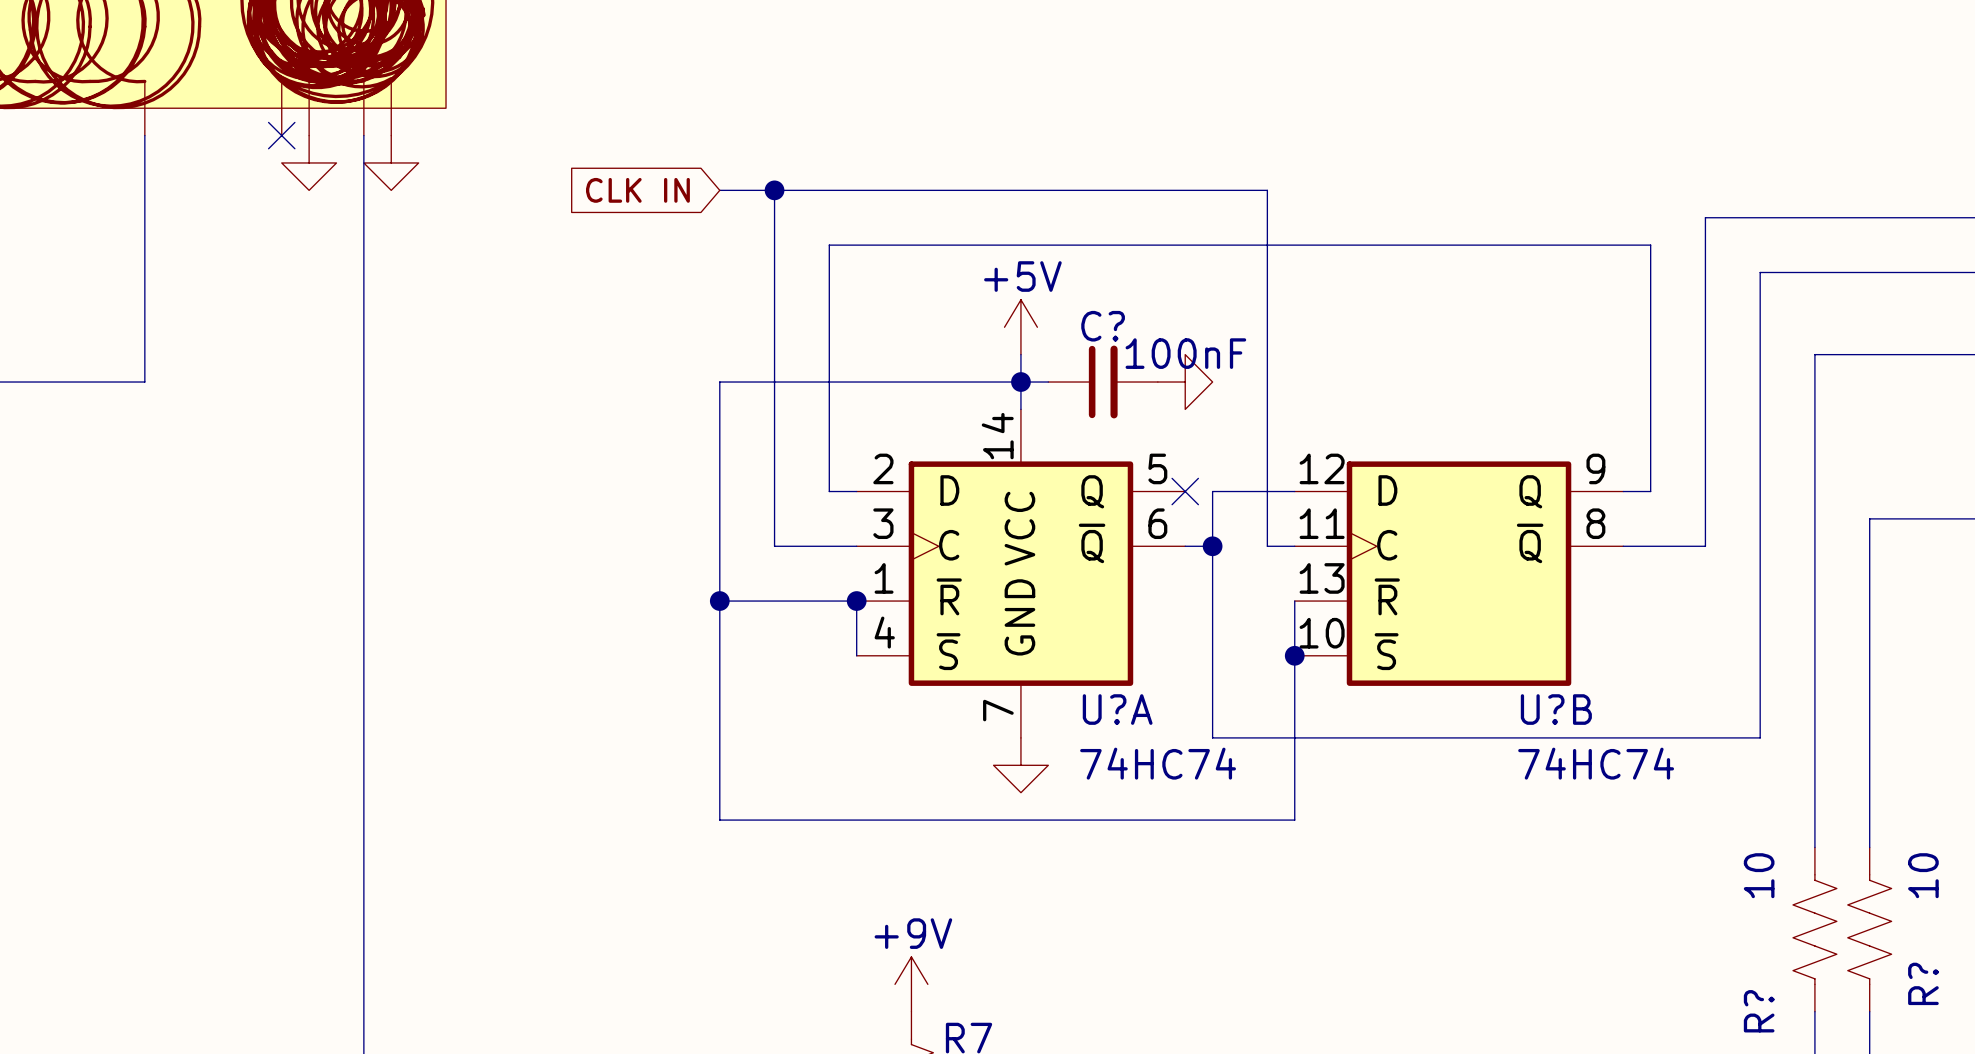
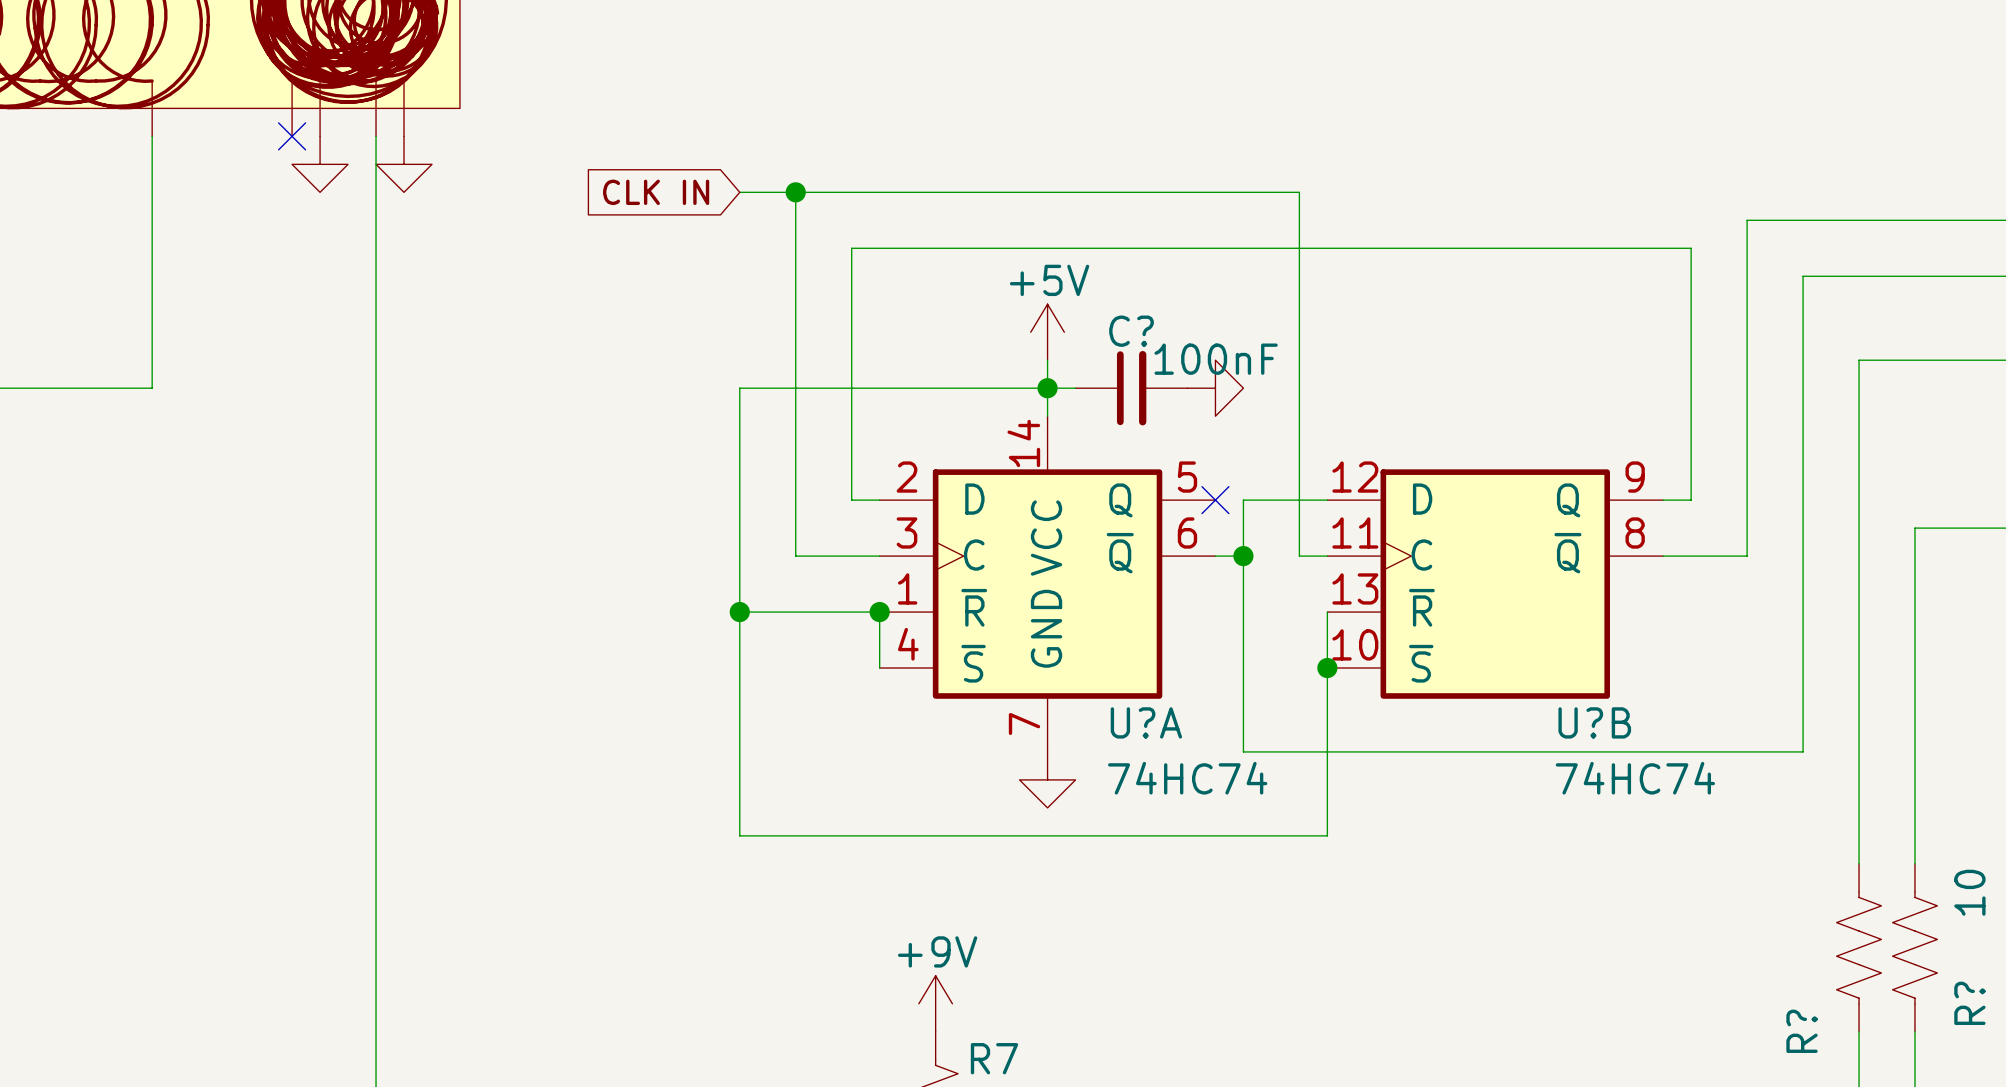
R? value: 10 (1759, 875) -> none

